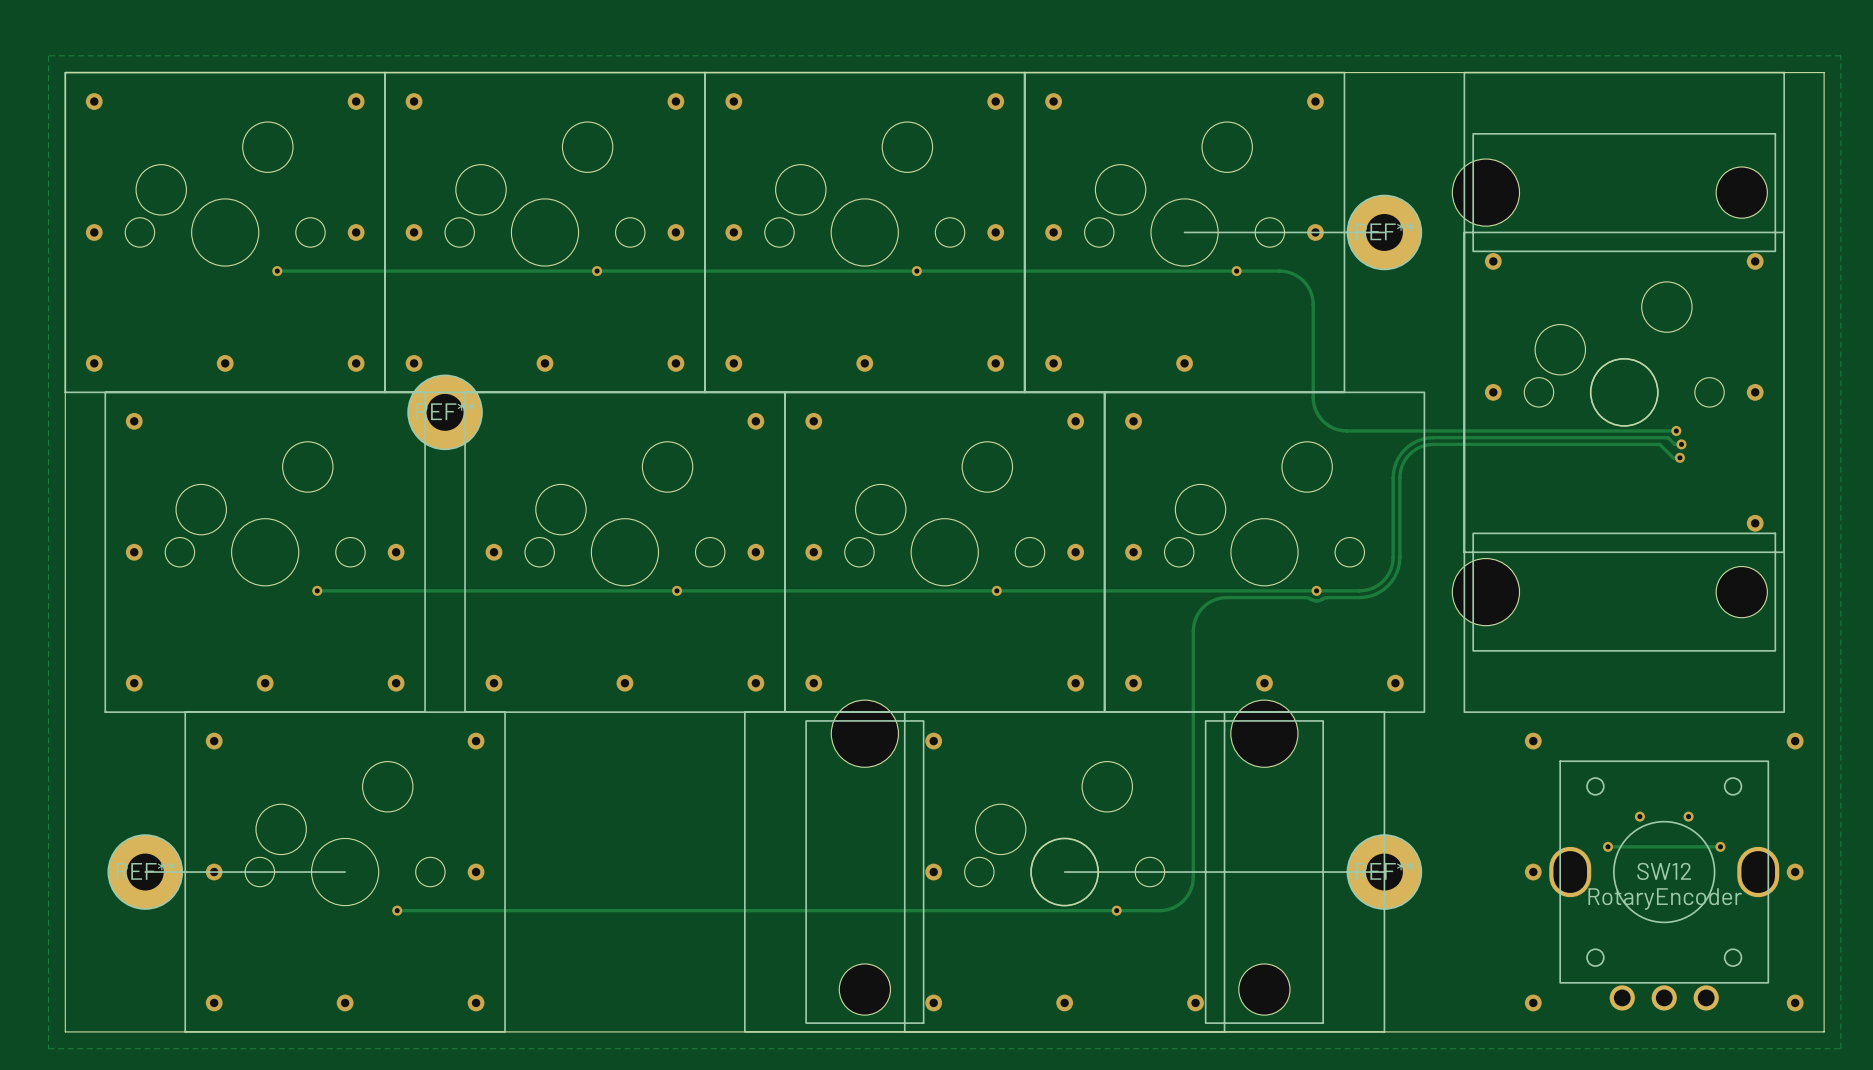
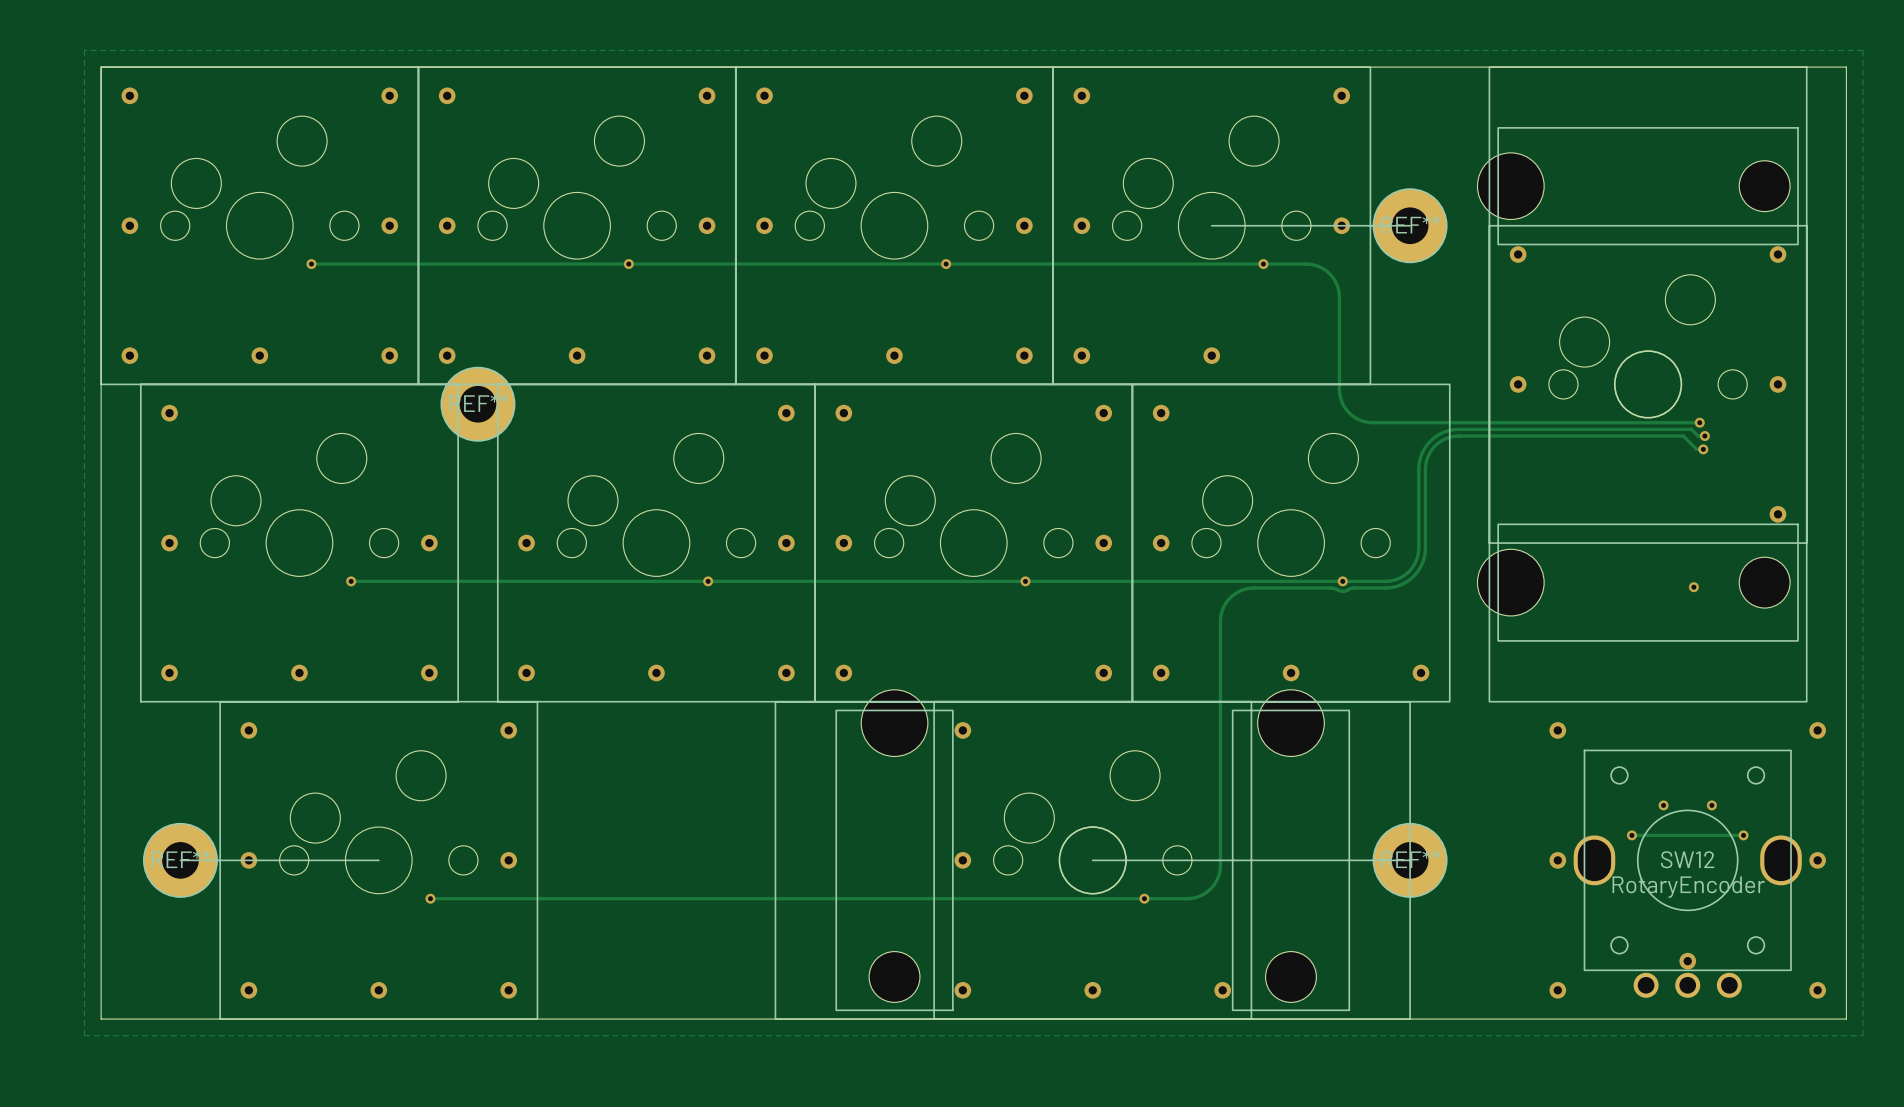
via: none -> (1693, 587)
via: none -> (1687, 961)

